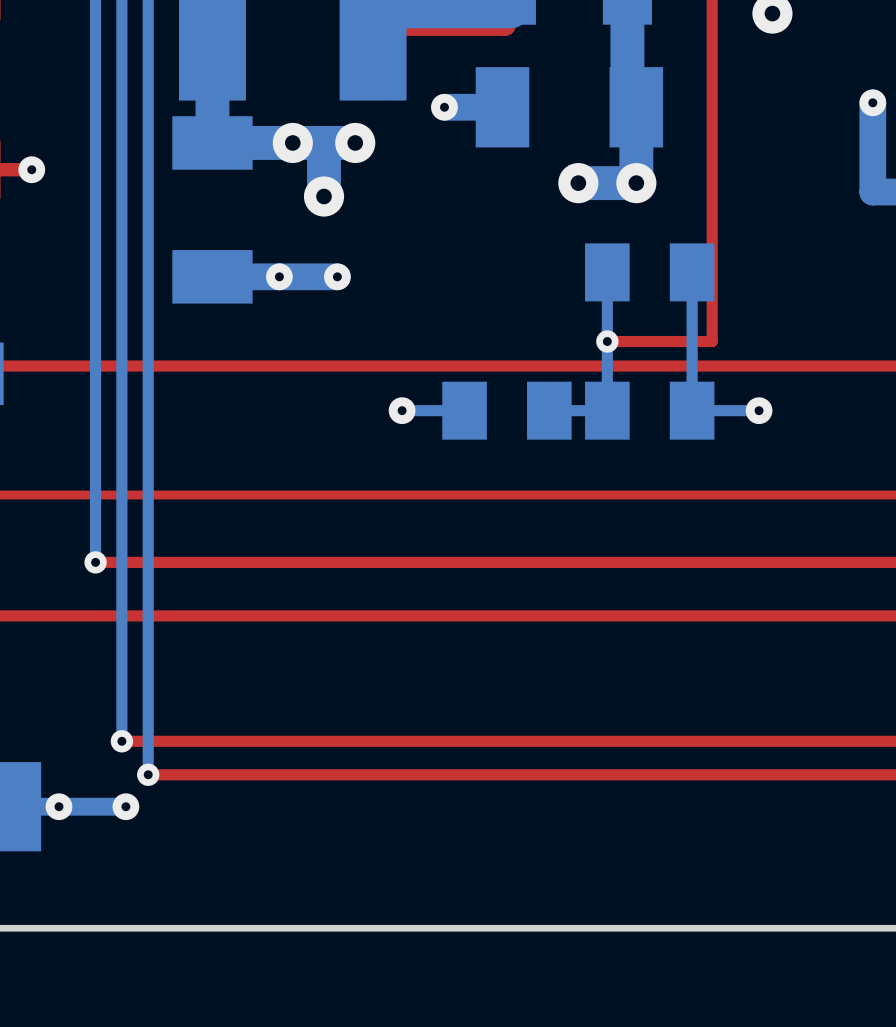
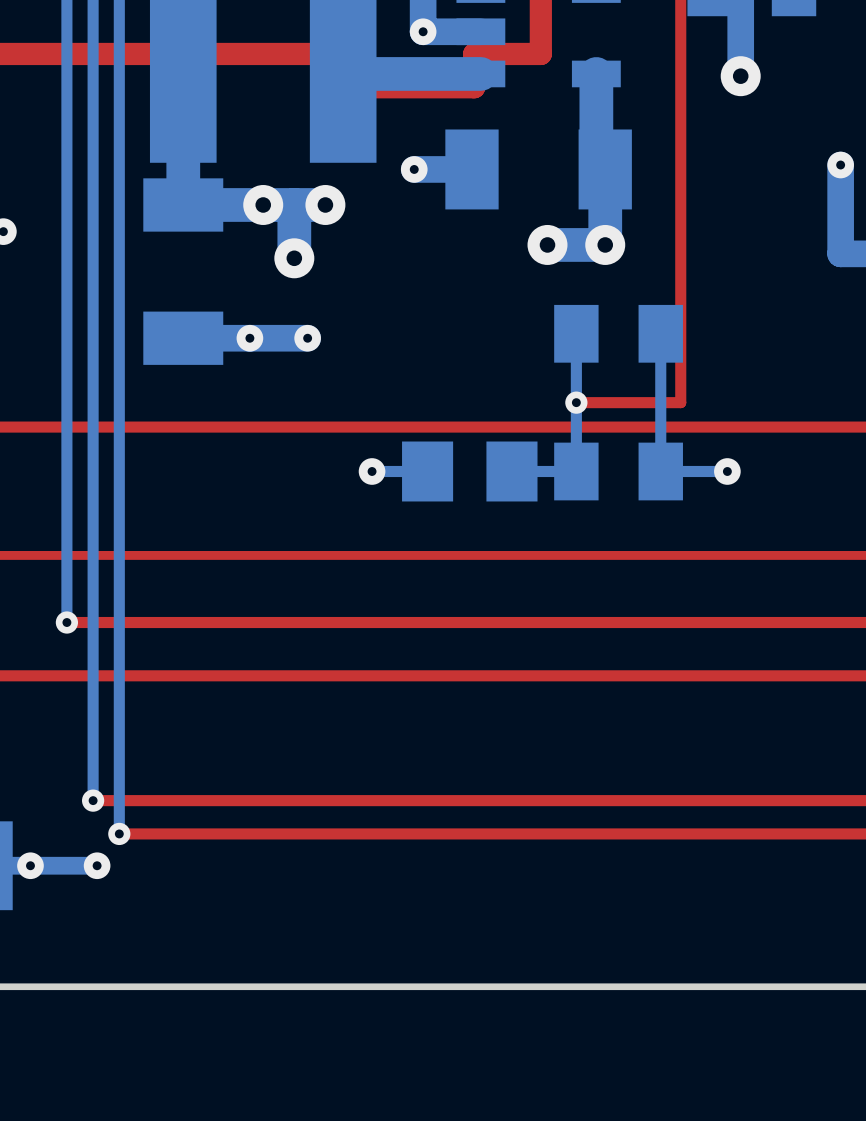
part footprint: [442, 381, 572, 440] -> [402, 441, 538, 502]

